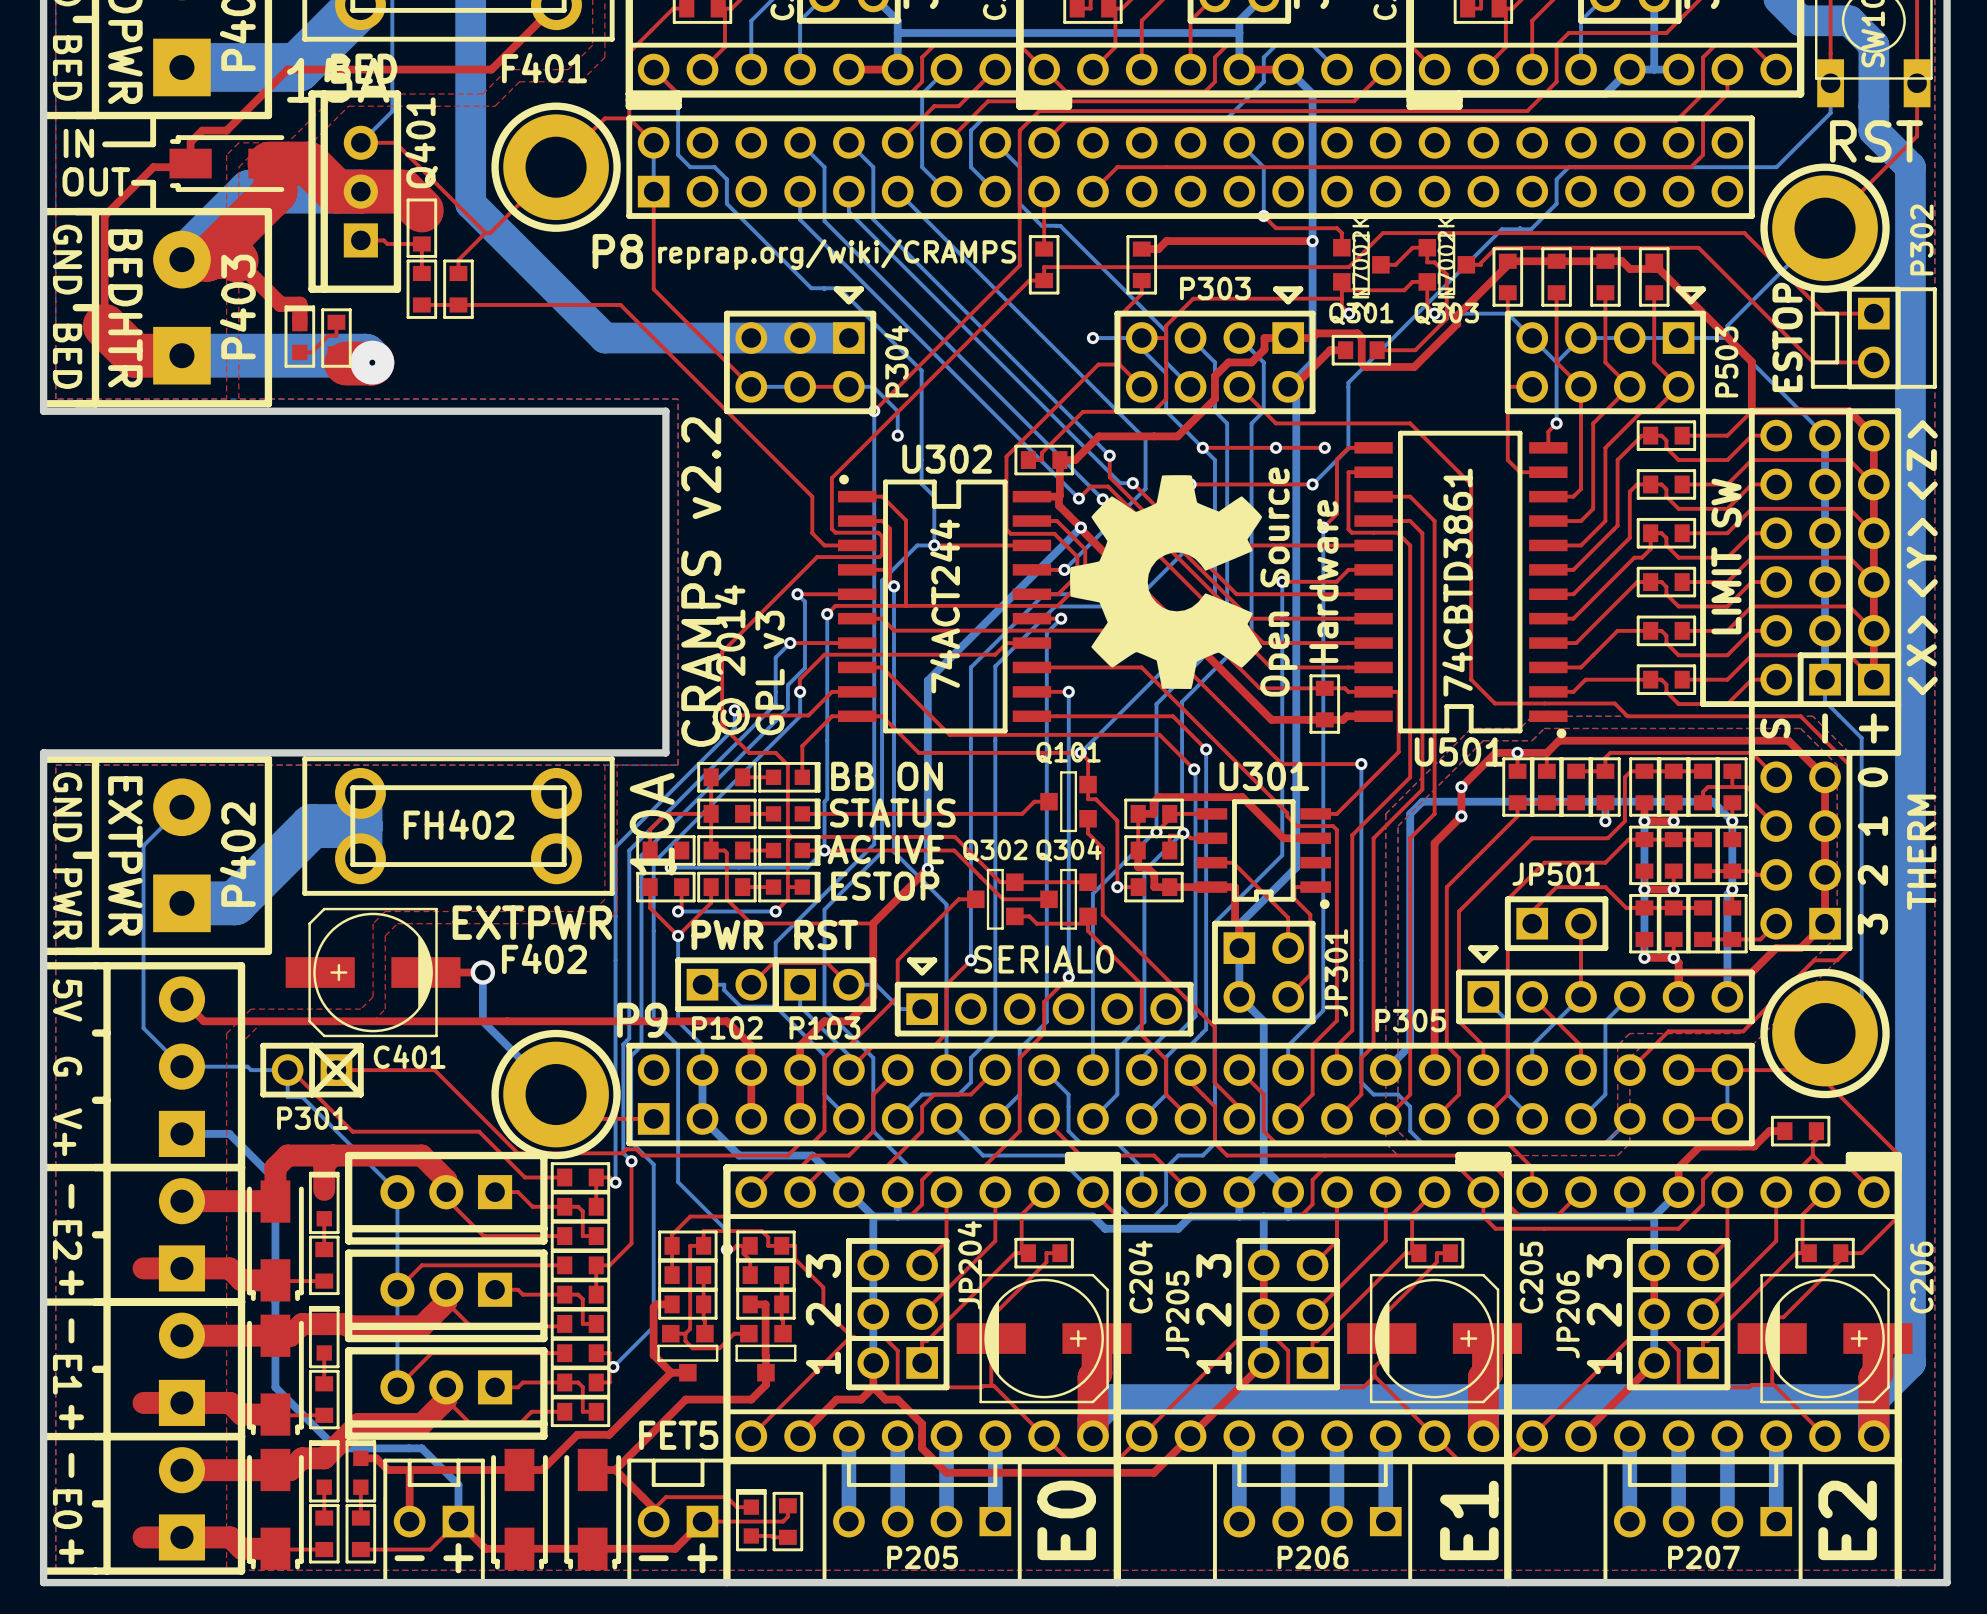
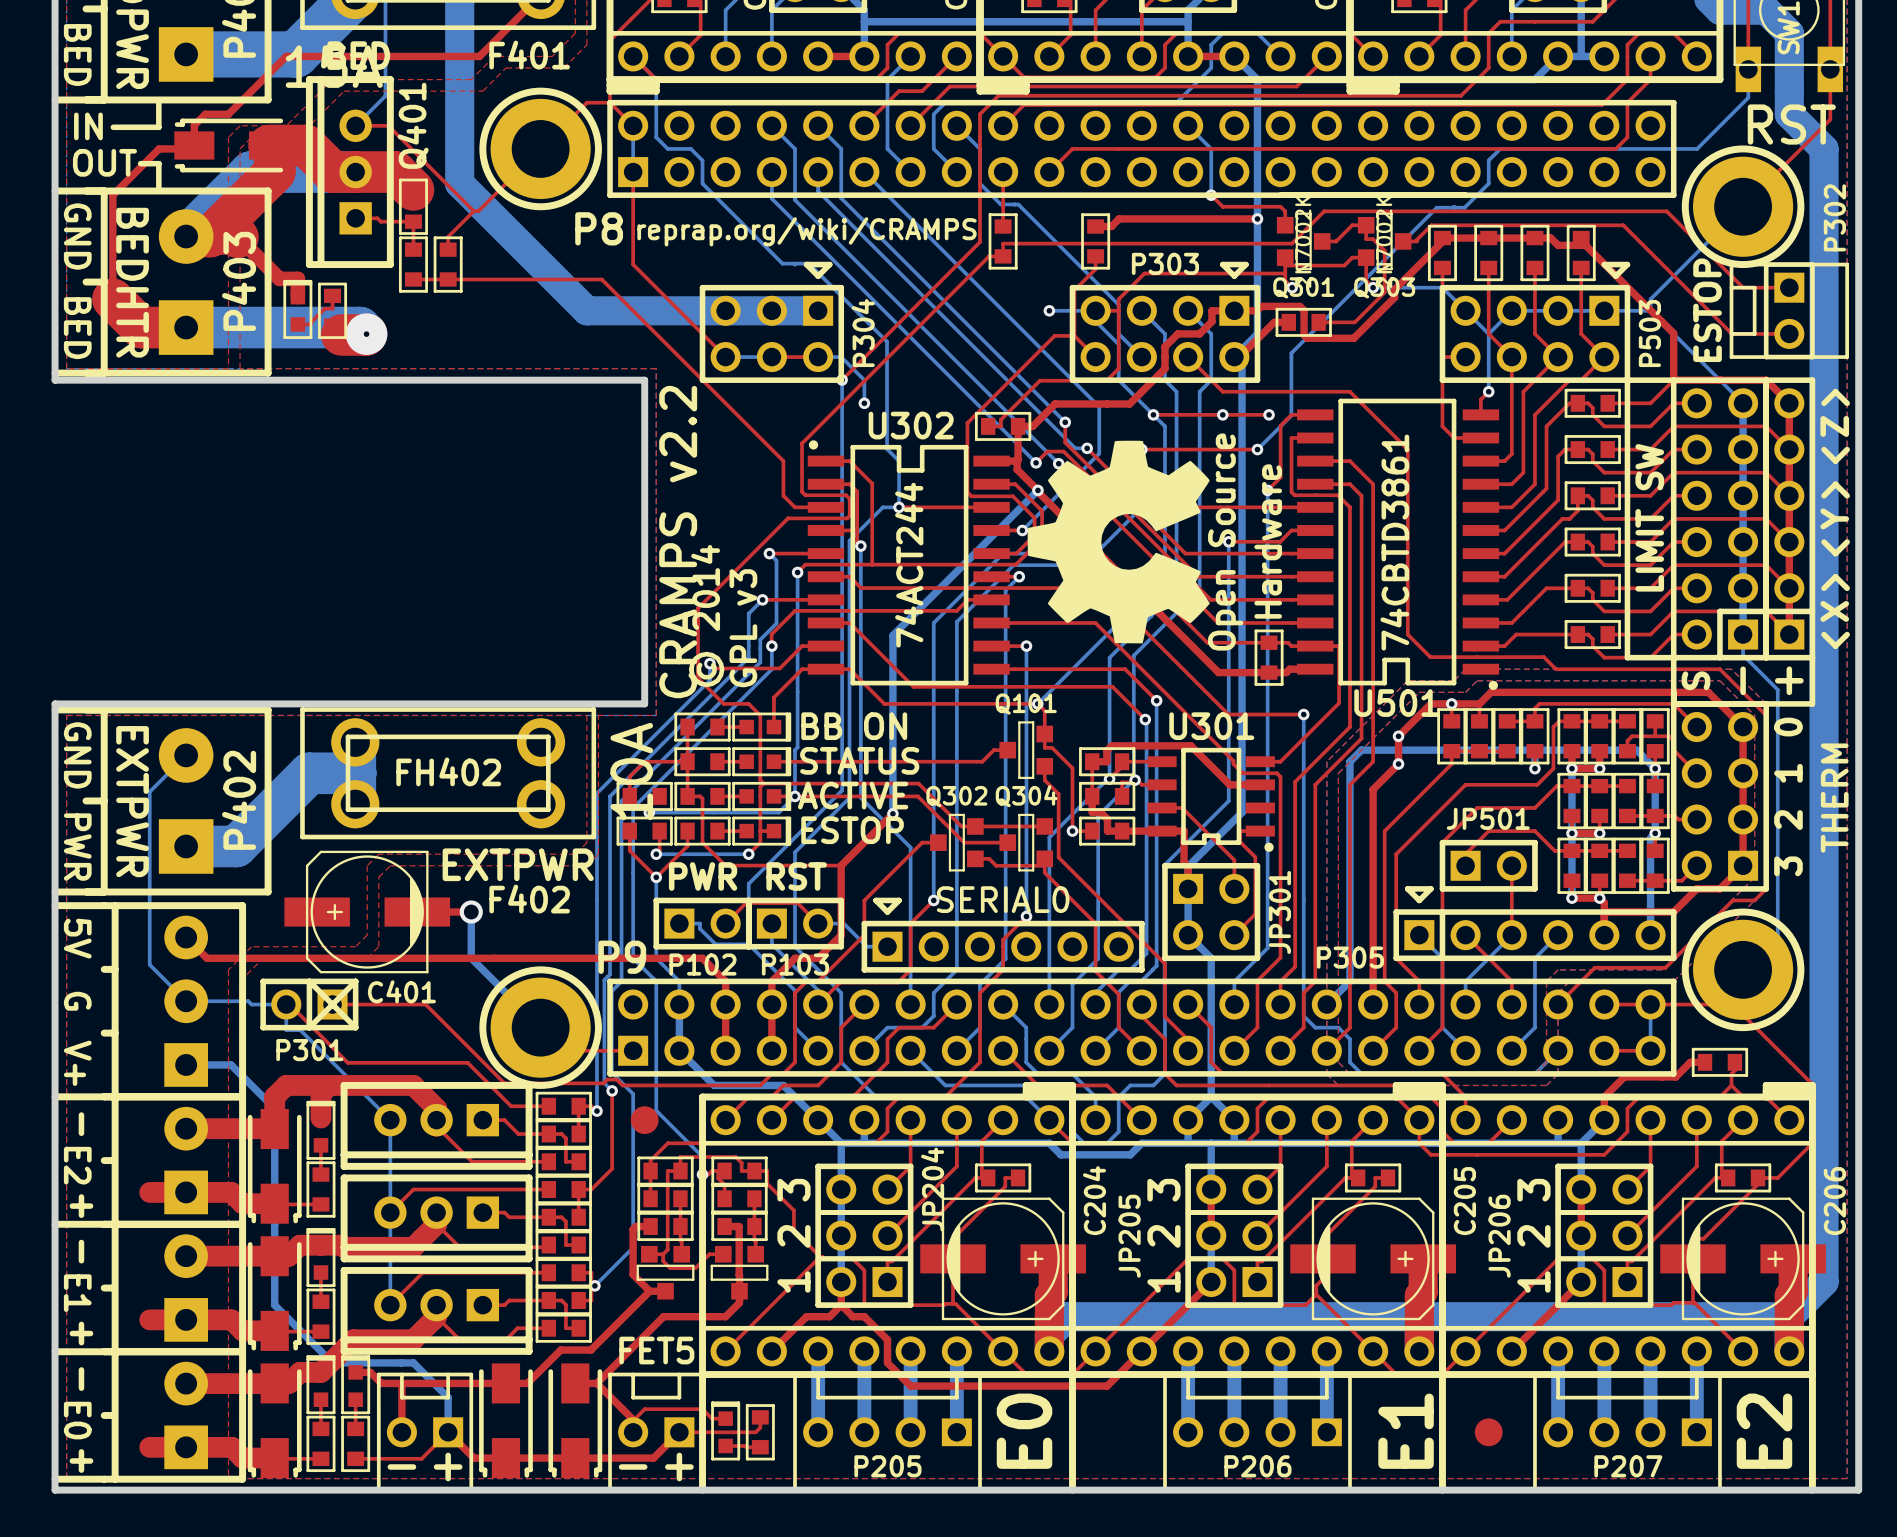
part: none -> (644, 1120)
part: none -> (1488, 1432)

